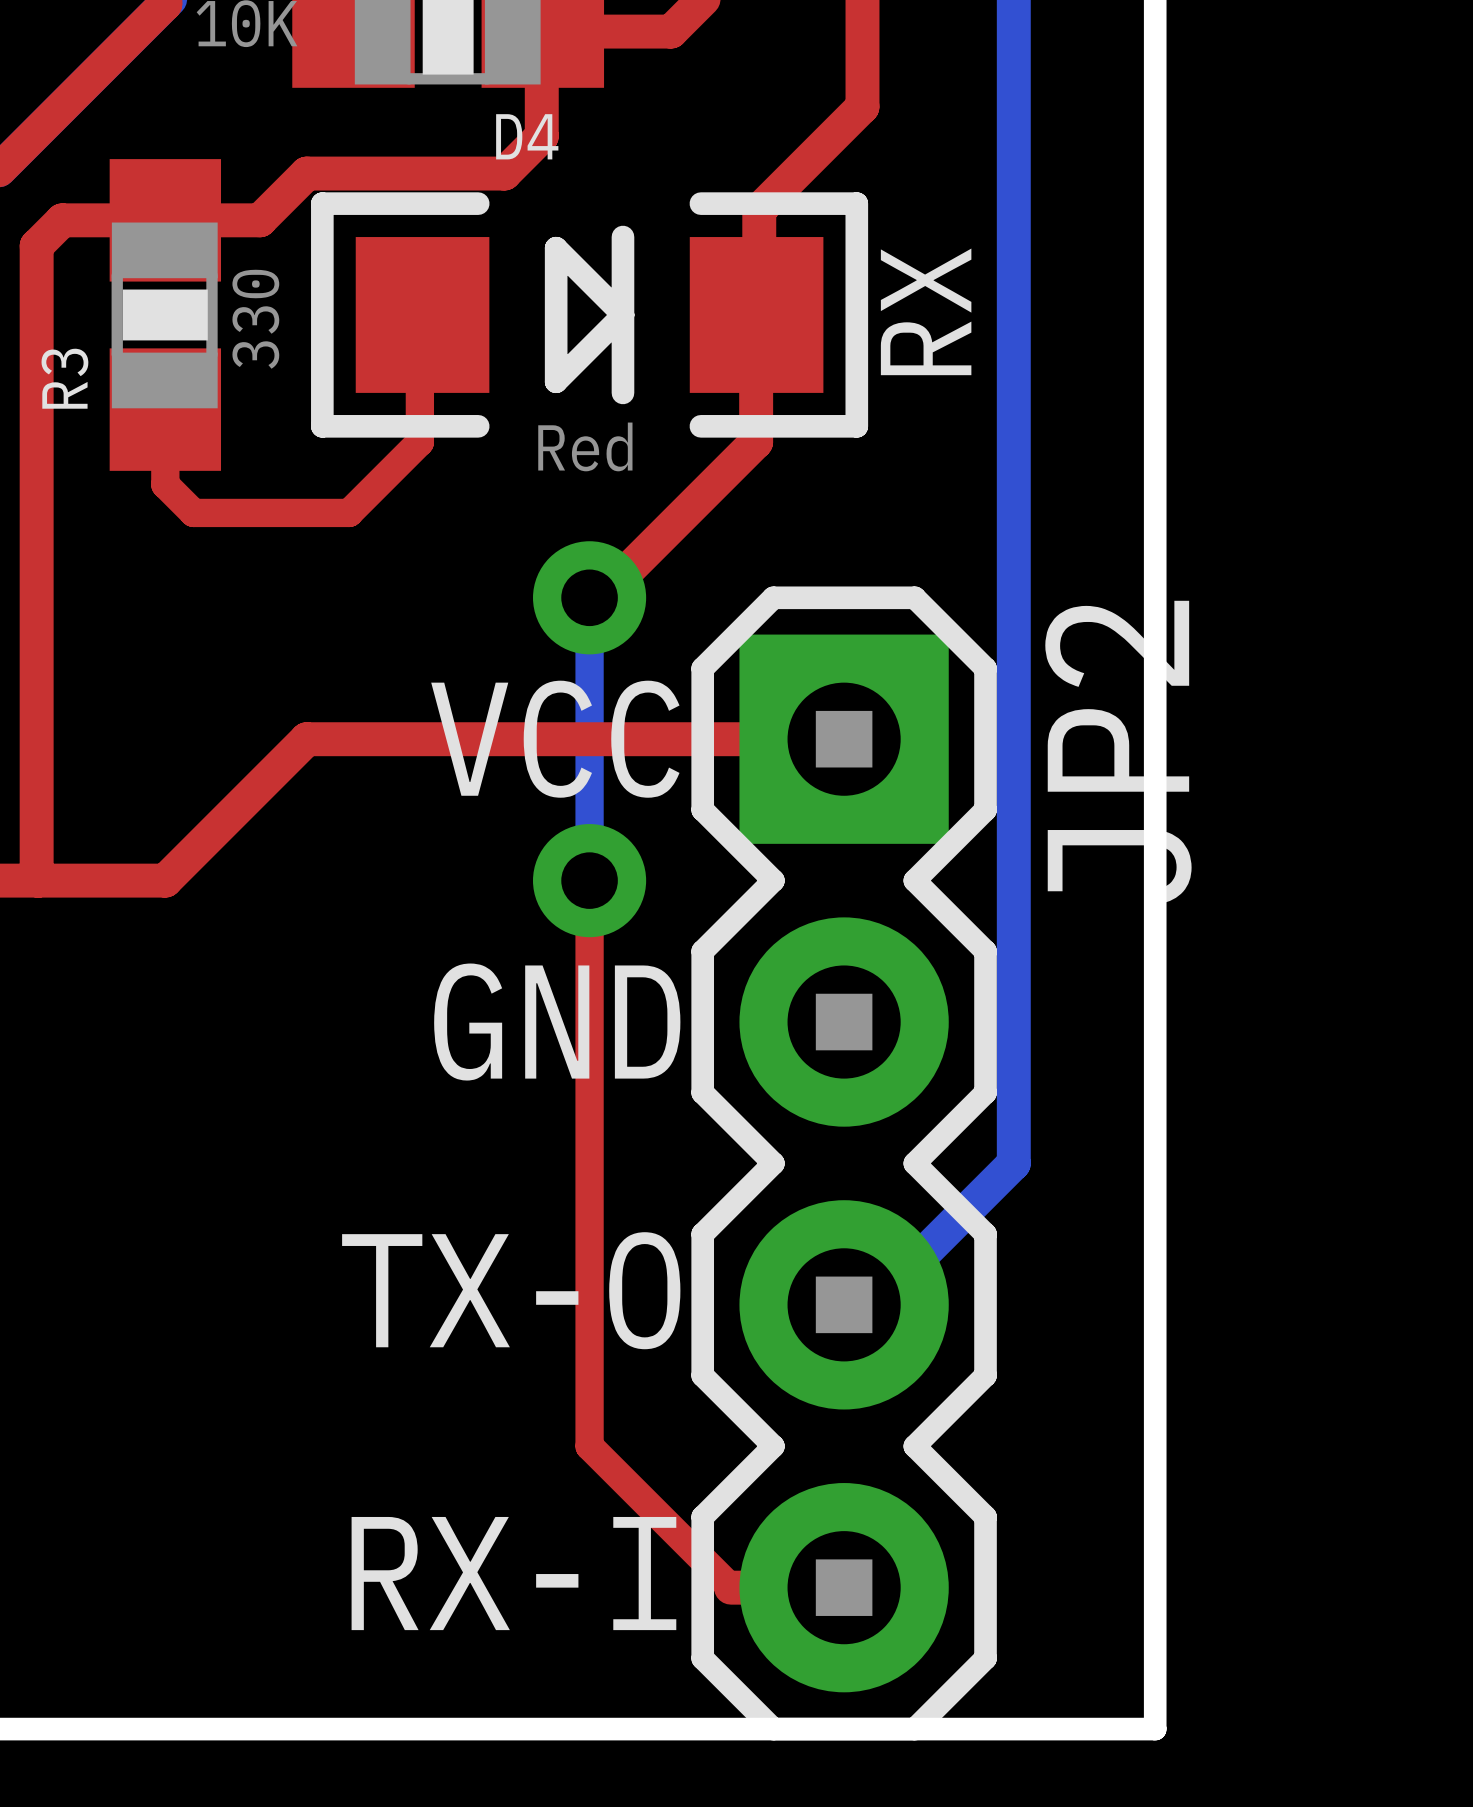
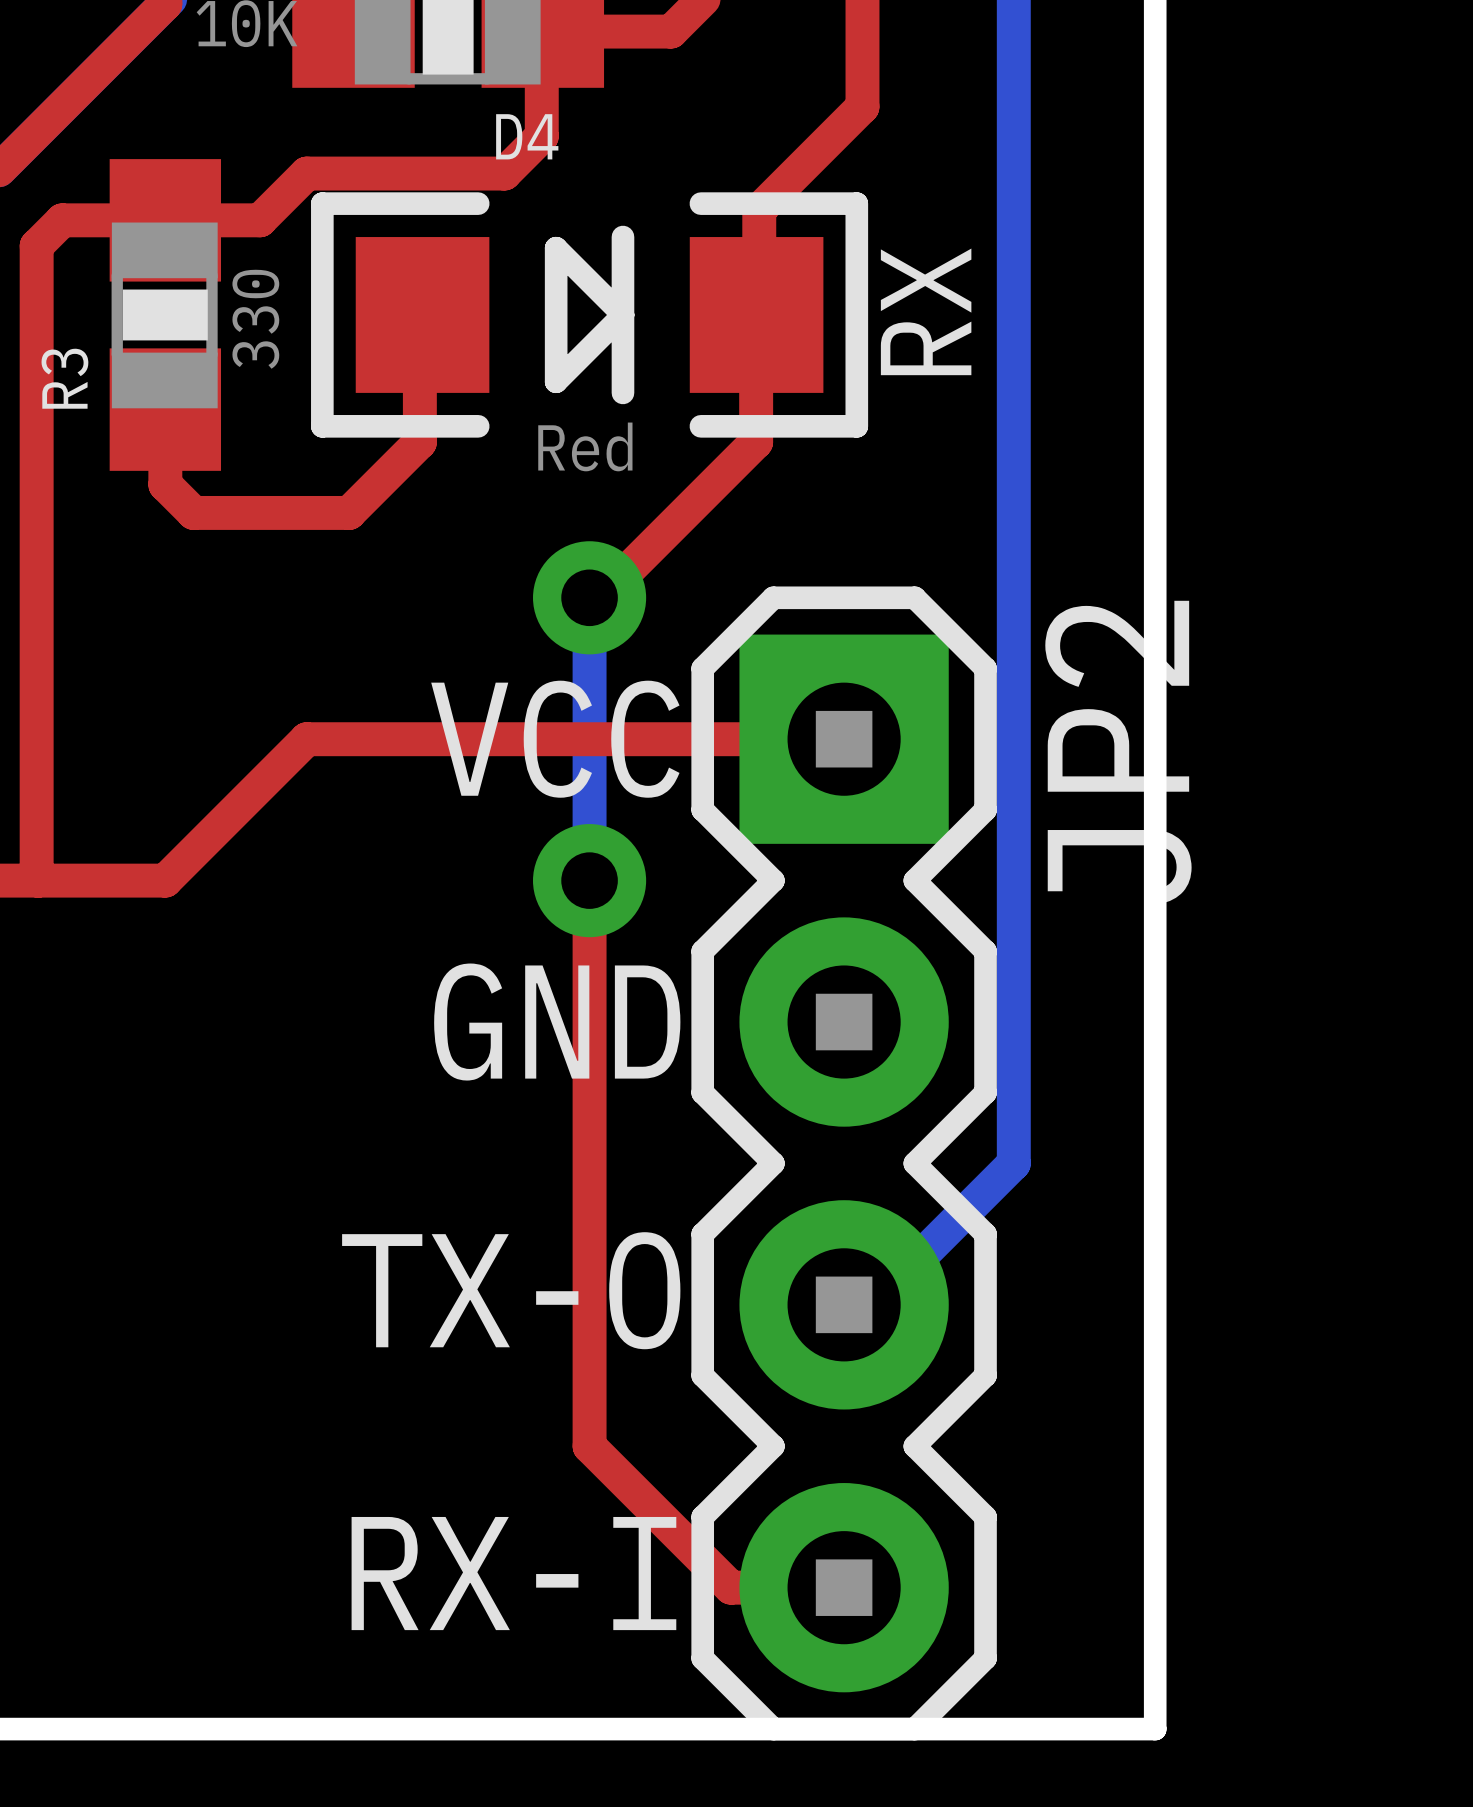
top track width: thin (419, 317) (419, 442) (349, 512) (193, 512) (165, 484) (165, 409) -> thick (419, 317) (419, 442) (349, 512) (193, 512) (165, 484) (165, 409)
bottom track width: thin (589, 597) (589, 880) -> thick (589, 597) (589, 880)
top track width: thin (589, 880) (589, 1446) (730, 1587) -> thick (589, 880) (589, 1446) (730, 1587)

